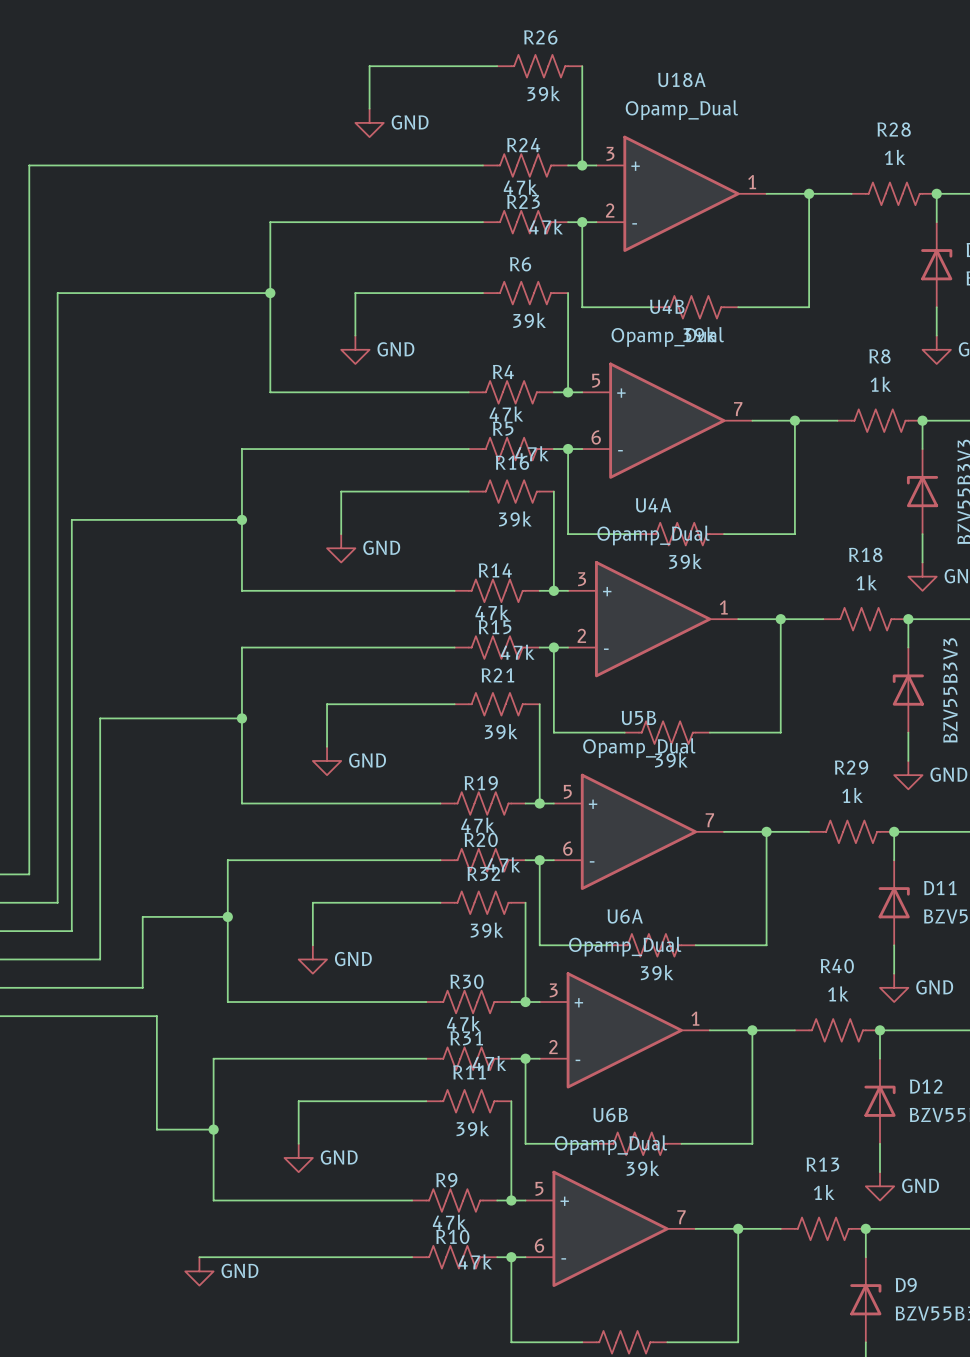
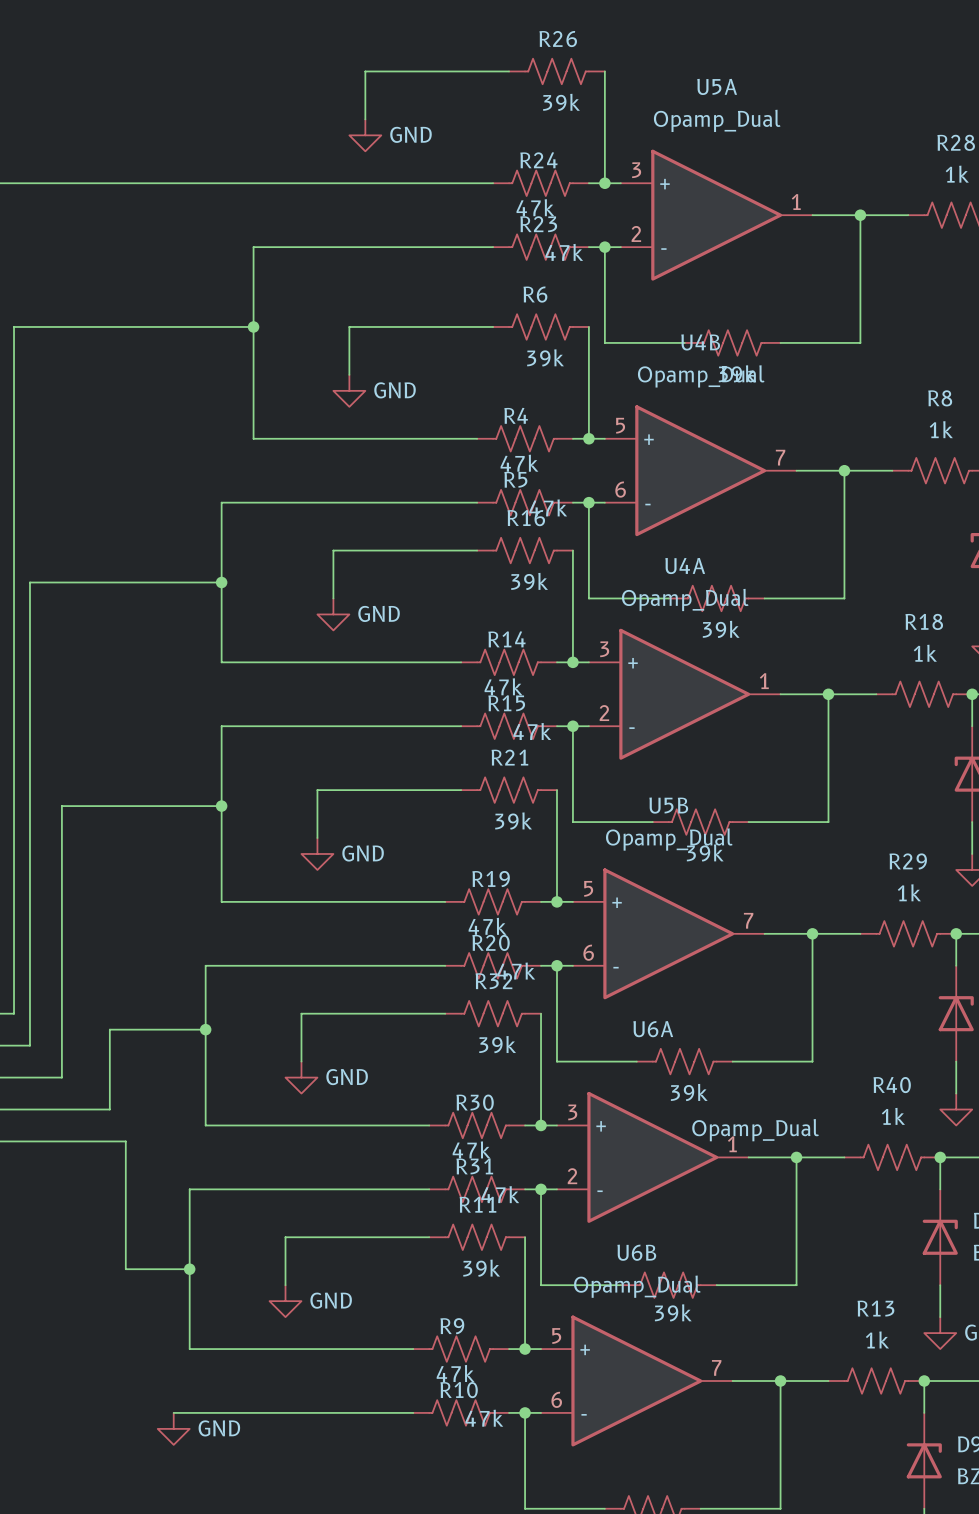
U18A name: U18A (681, 79) -> U5A (717, 86)
U6A value position: Opamp_Dual (625, 946) -> Opamp_Dual (755, 1130)

